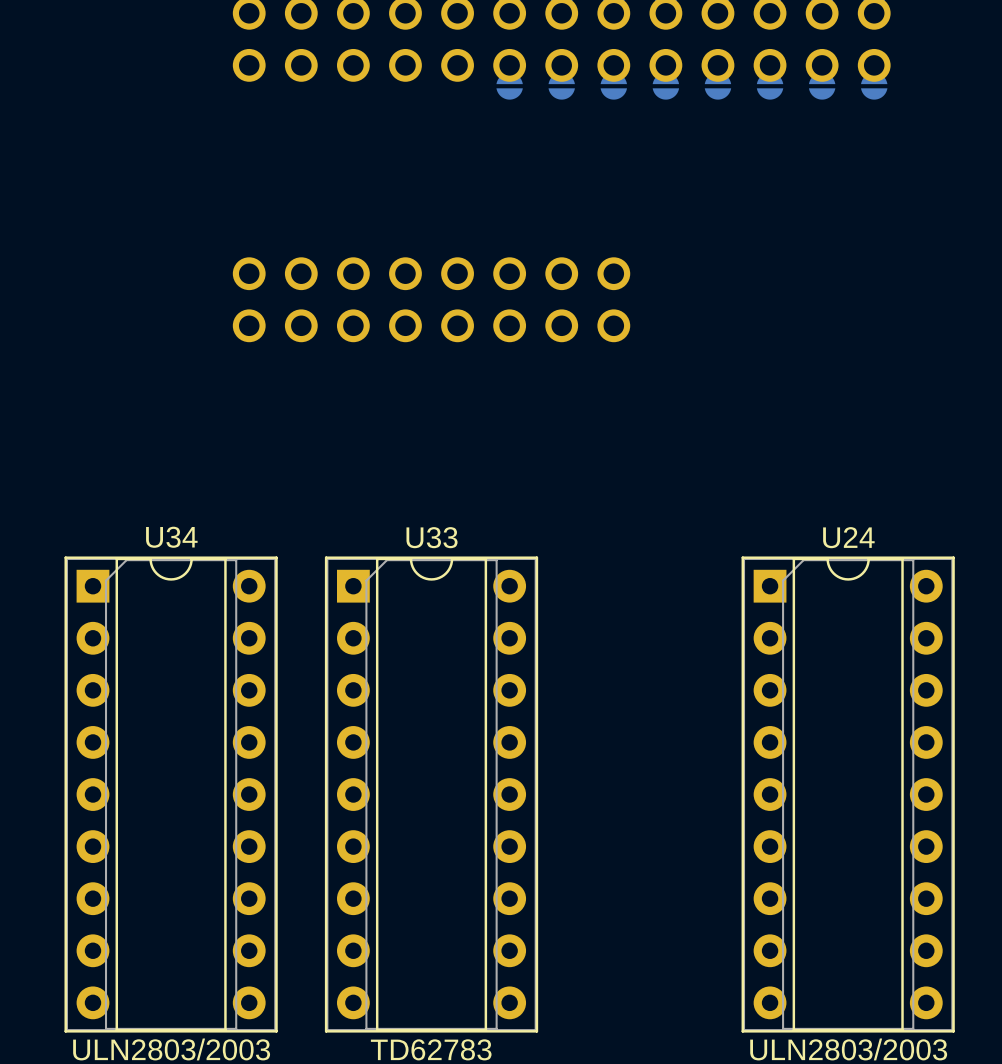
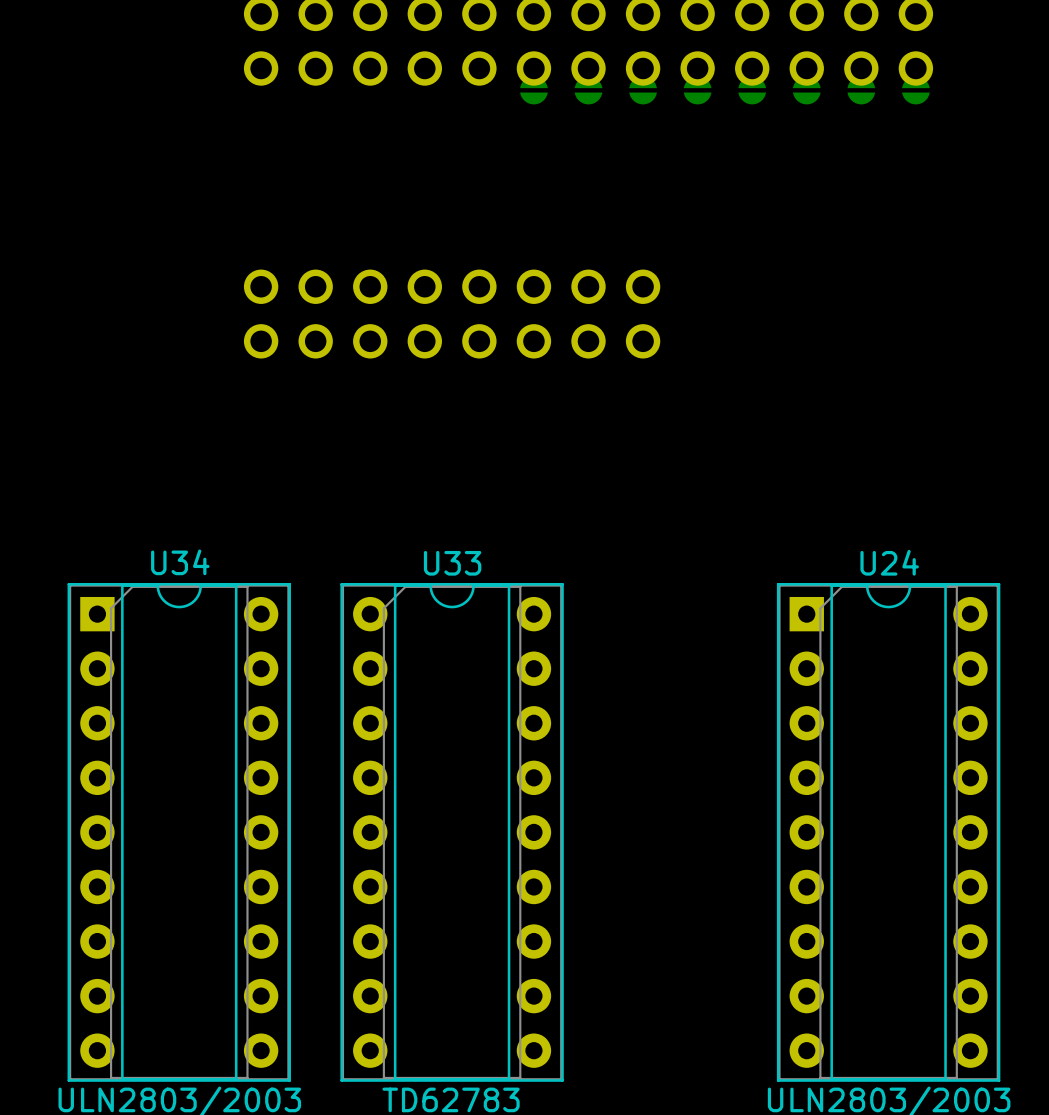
U33 footprint: [324, 556, 539, 1033] -> [340, 583, 564, 1082]

